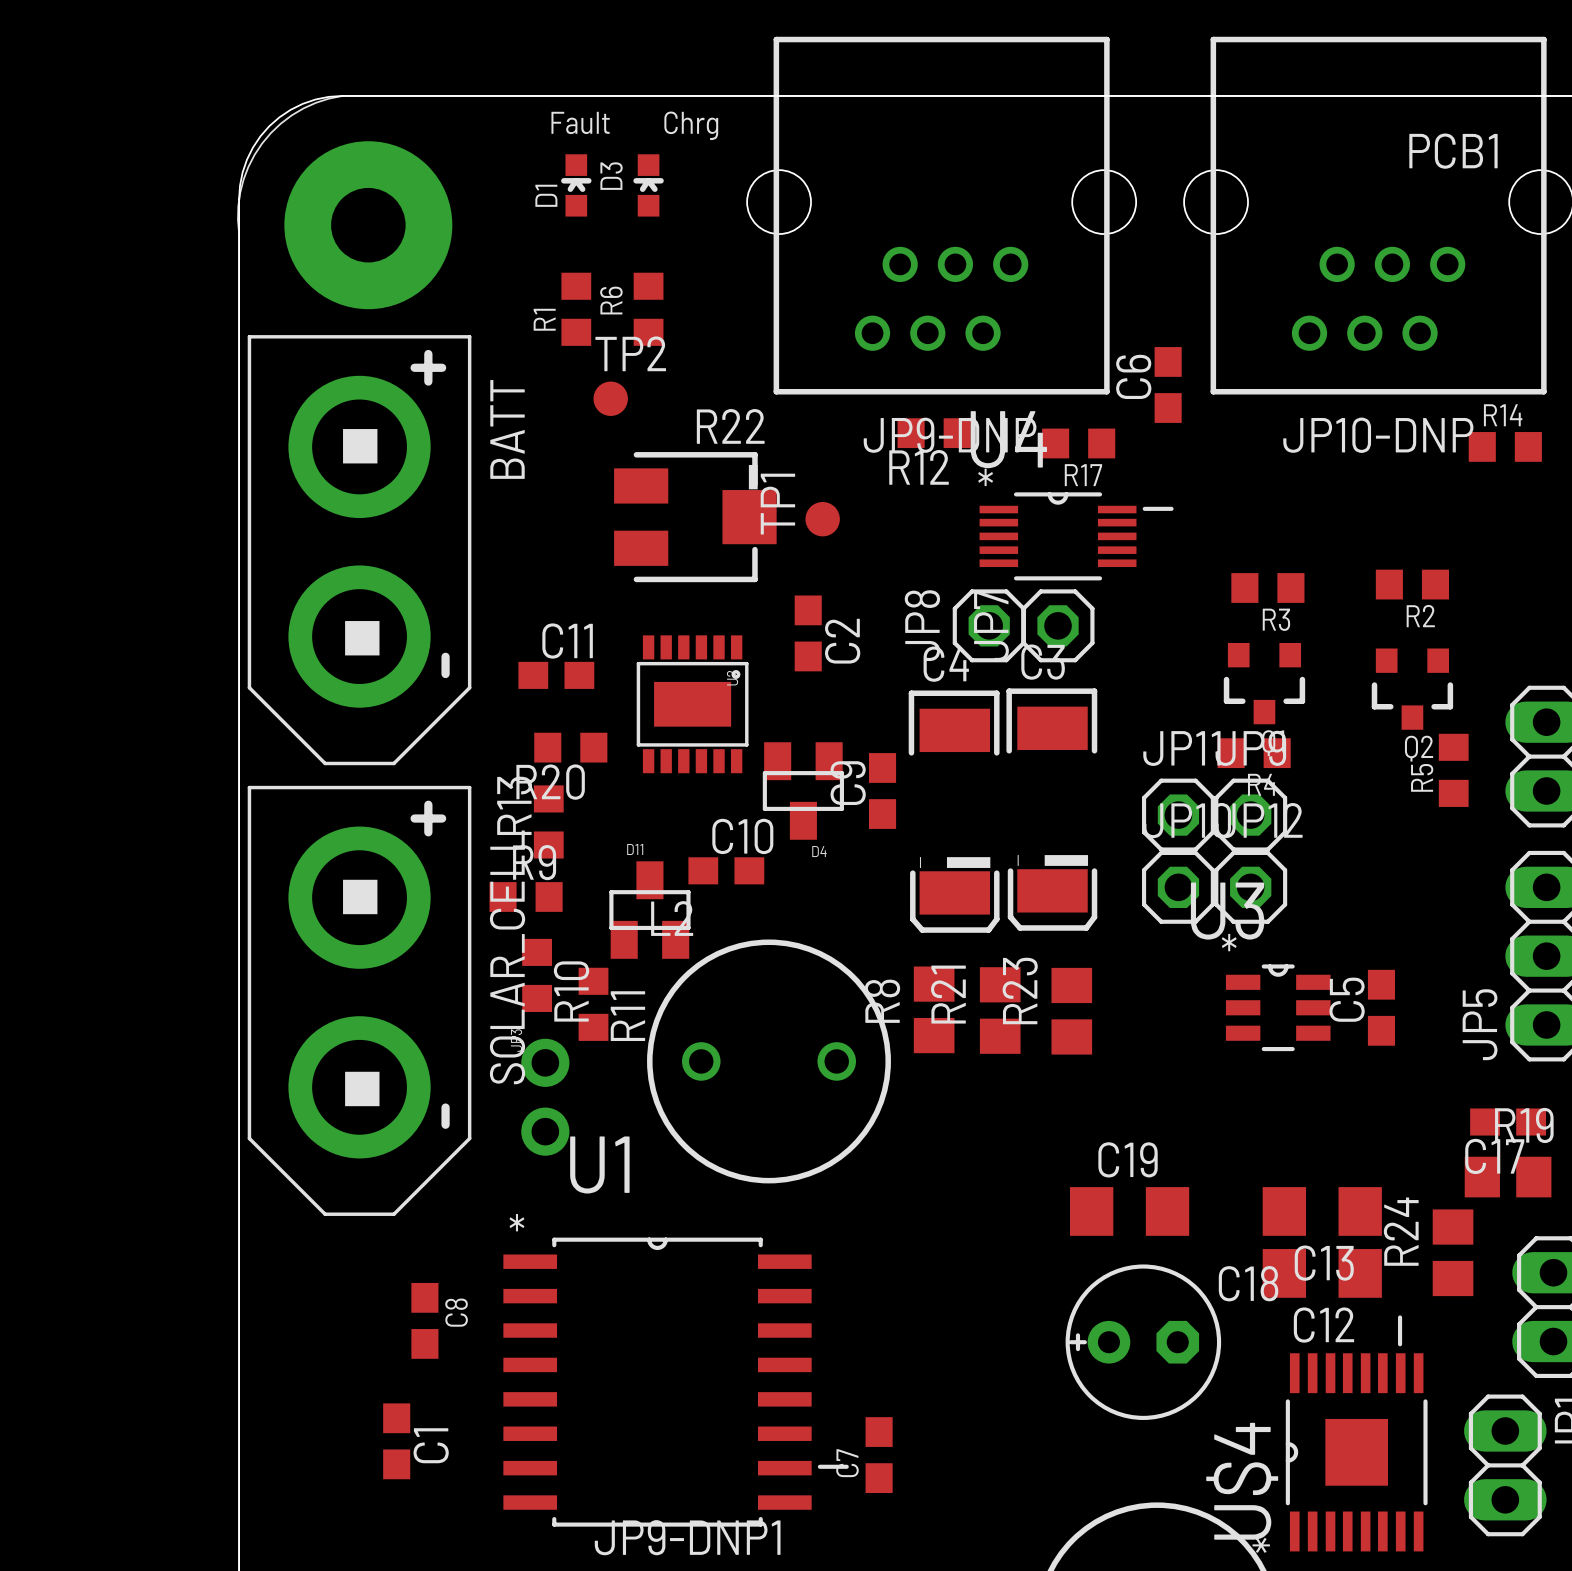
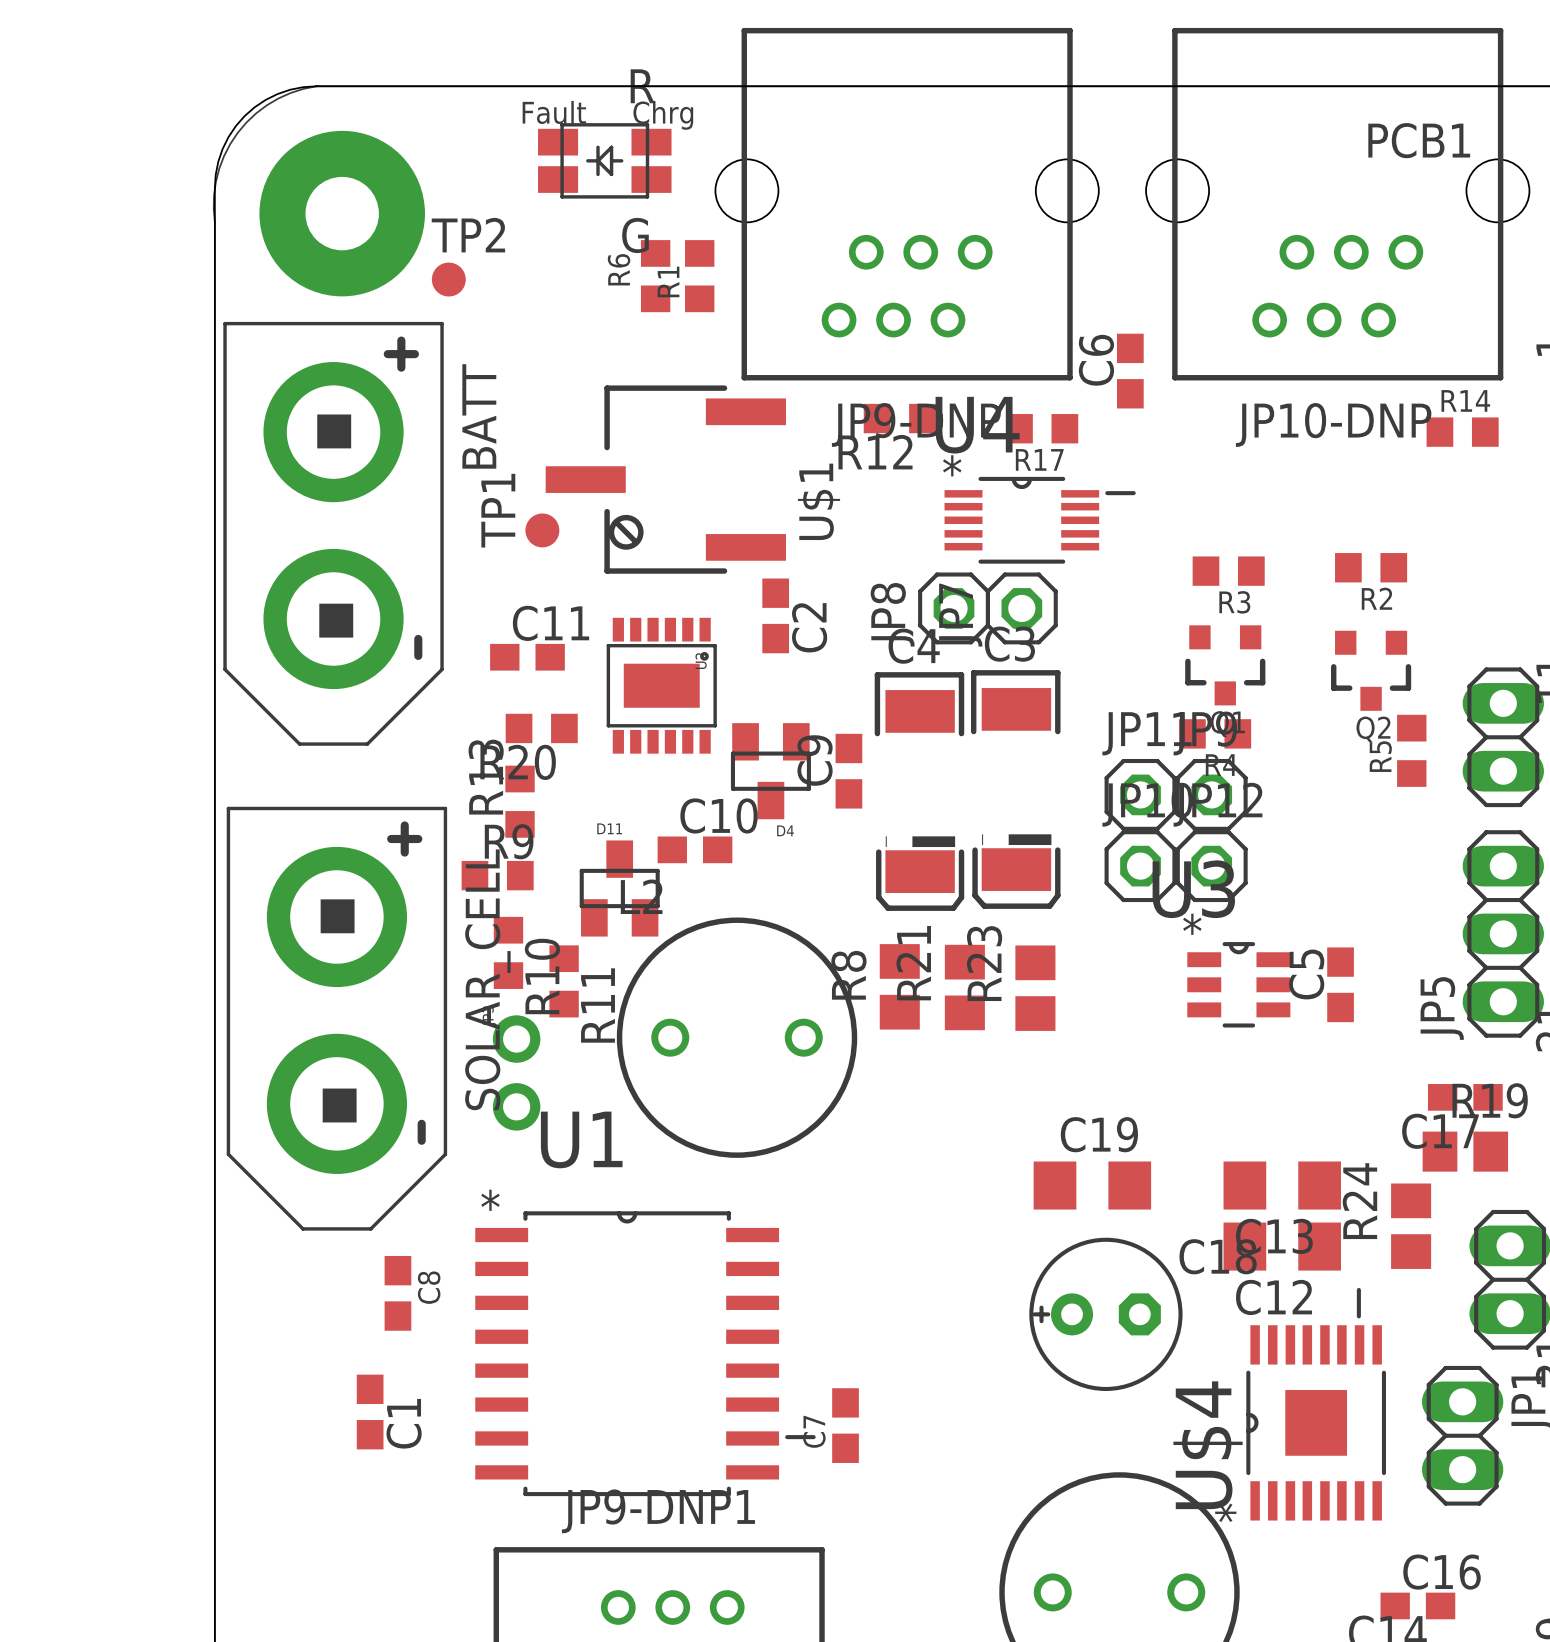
part: none -> (604, 160)
D1: (576, 185) -> none
D3: (648, 185) -> none
R1 position: (576, 309) -> (699, 276)
R6 position: (648, 309) -> (655, 276)
TP2 position: (610, 398) -> (448, 279)
U$1: none -> (665, 479)
R22: (695, 517) -> none
TP1 position: (822, 519) -> (542, 530)
SOLAR_CELL position: (359, 1000) -> (336, 1018)

